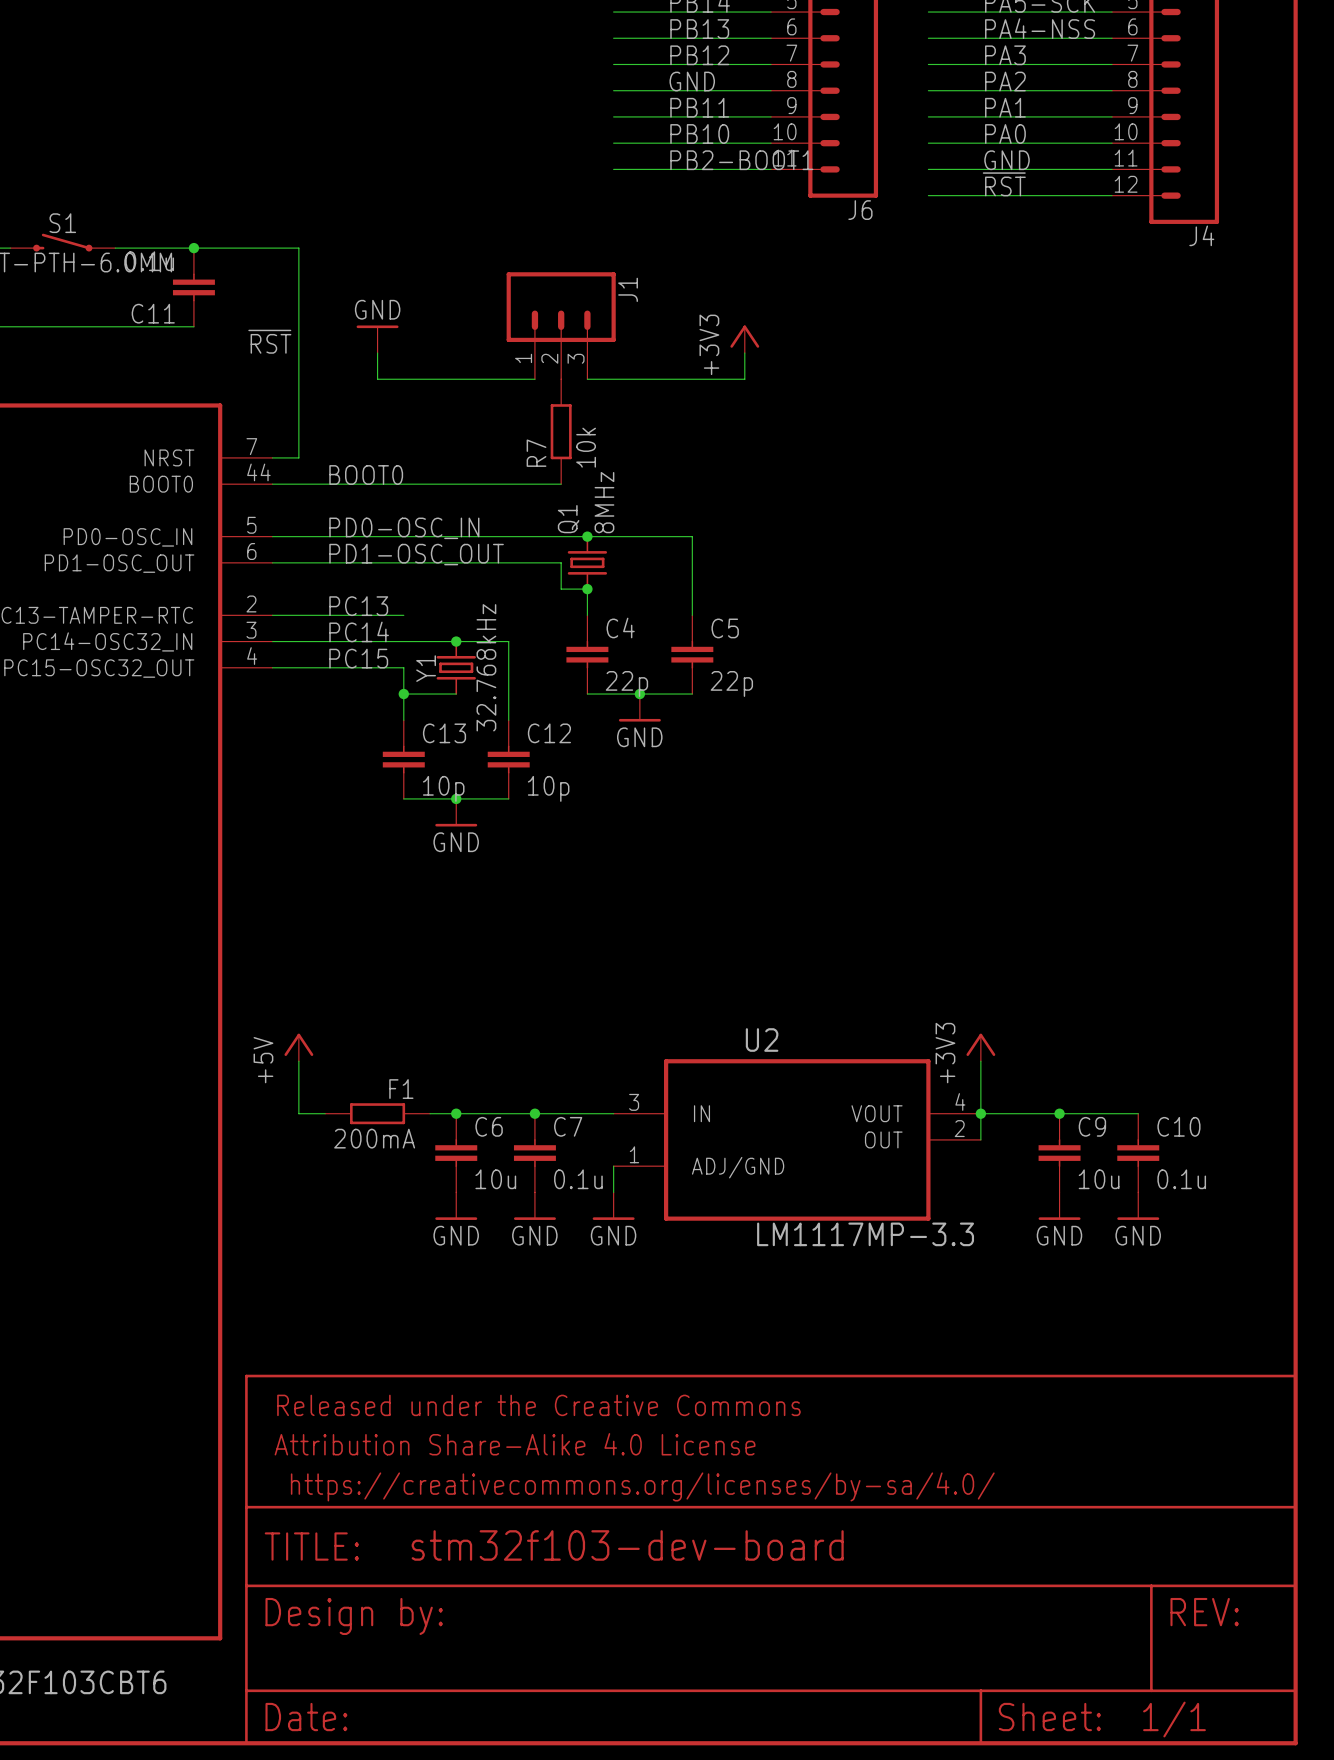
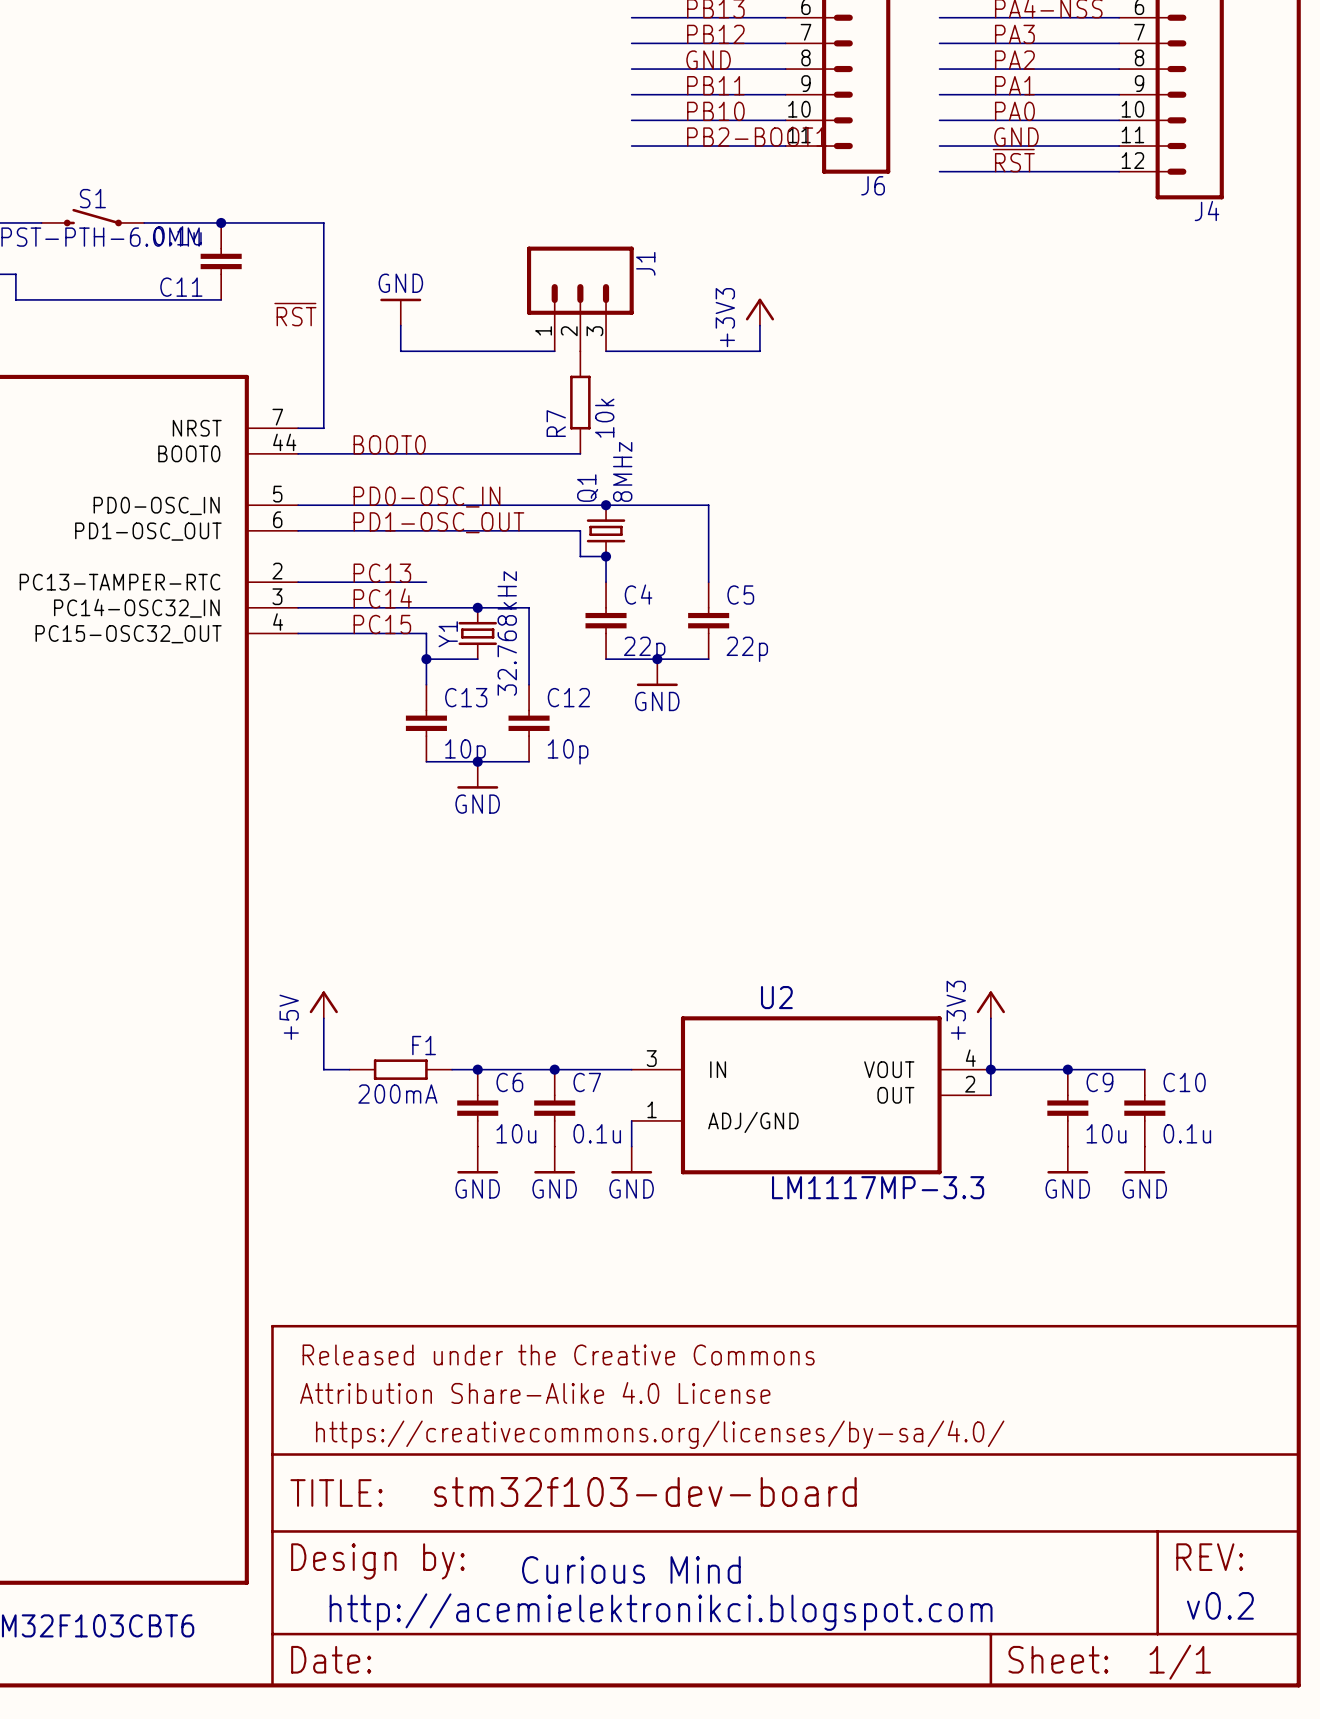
text: none -> Curious Mind (631, 1569)
text: none -> v0.2 (1220, 1605)
text: none -> http://acemielektronikci.blogspot.com (661, 1612)

